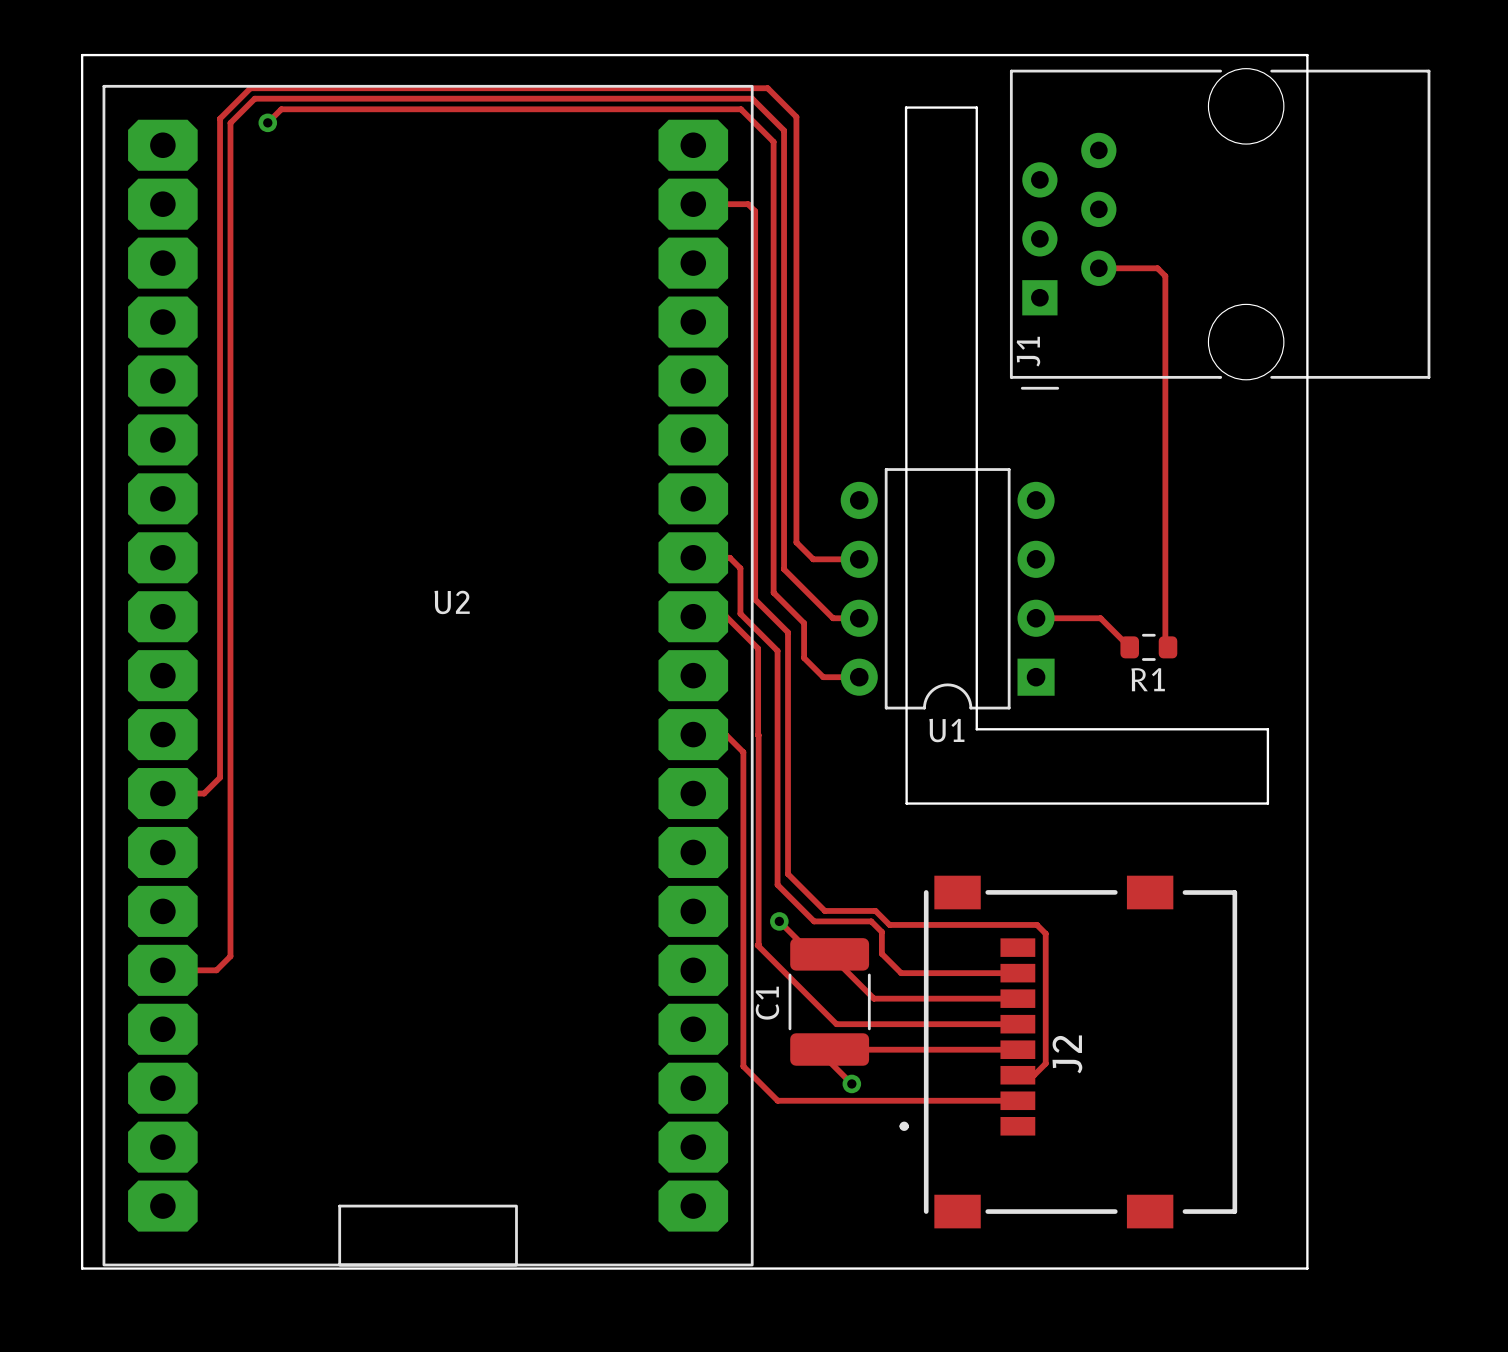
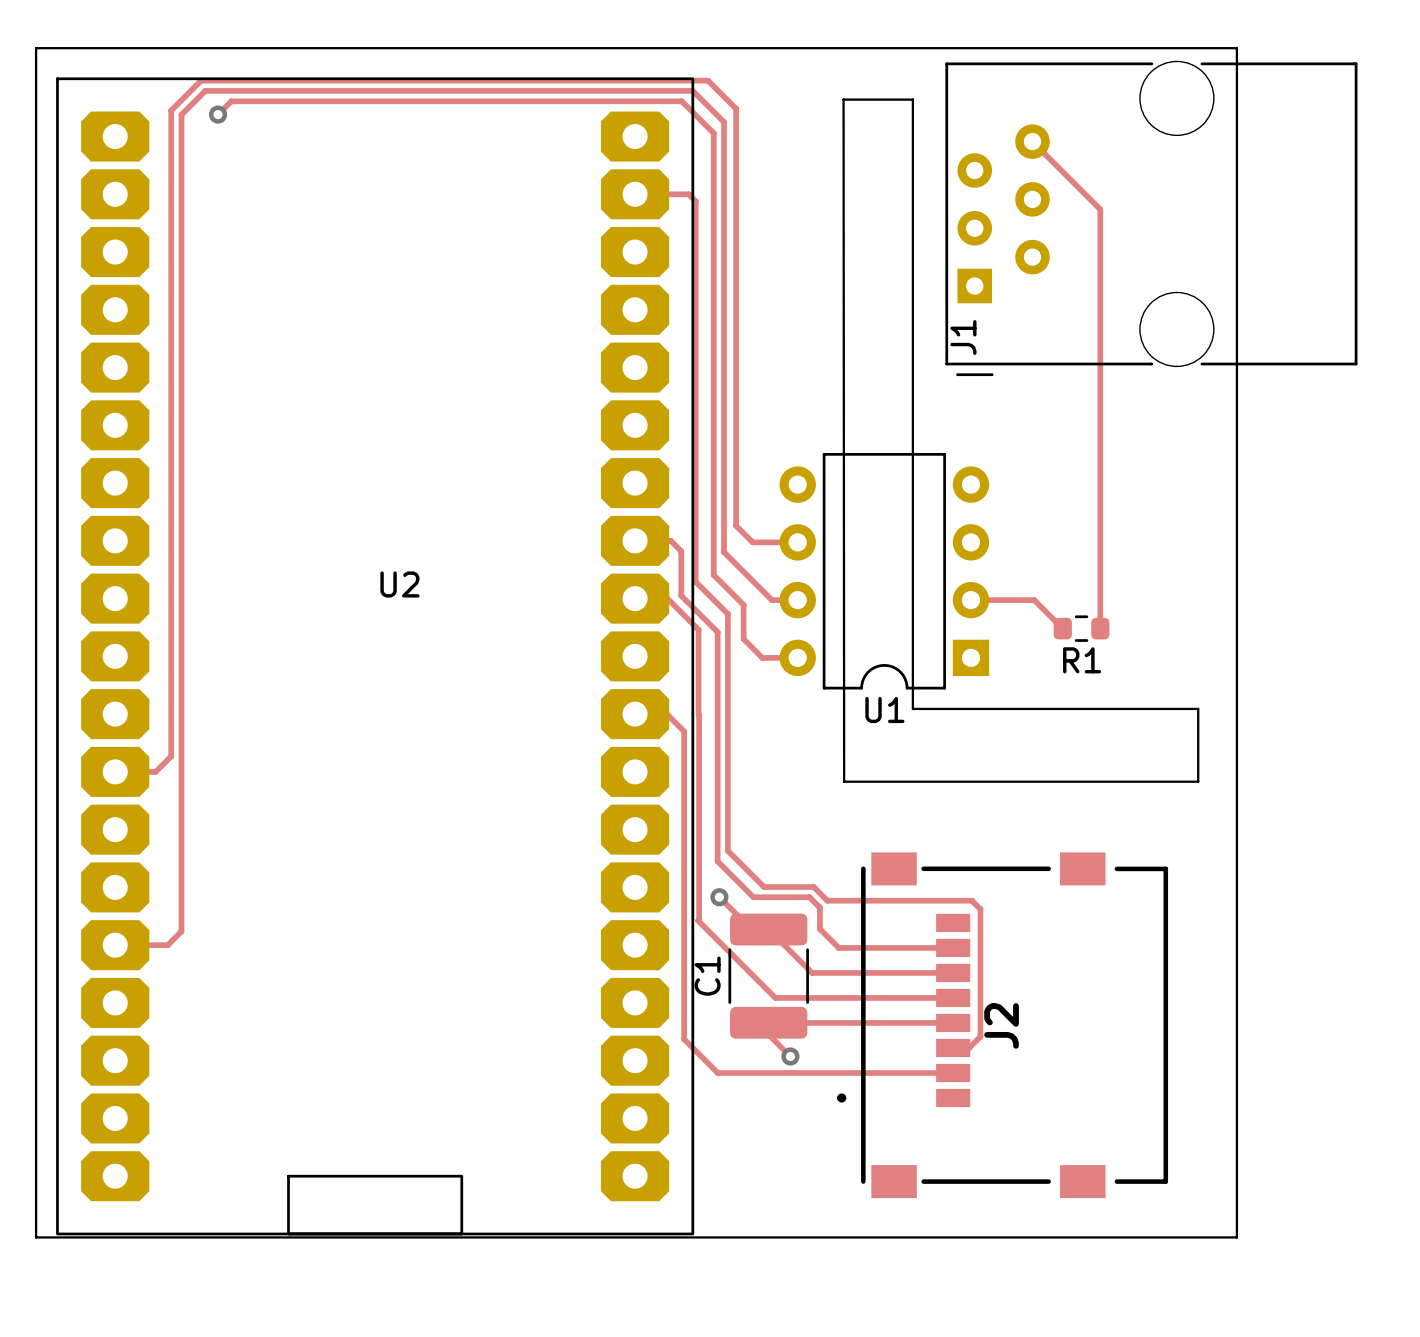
track: (1098, 268) (1157, 268) (1165, 276) (1165, 644) (1168, 647) -> (1032, 141) (1100, 209) (1100, 628)

